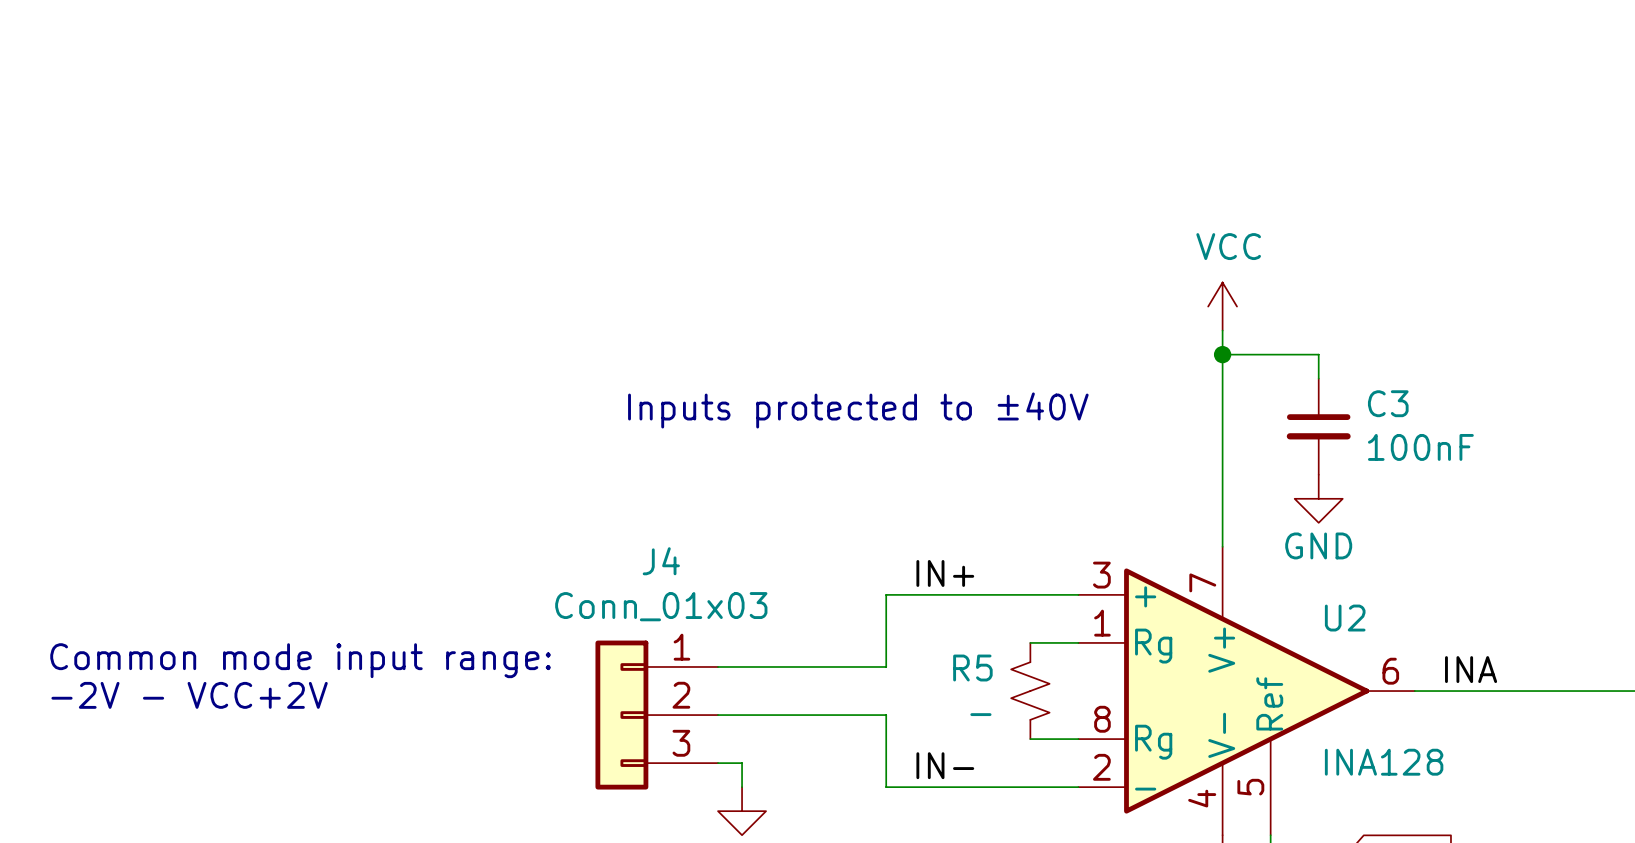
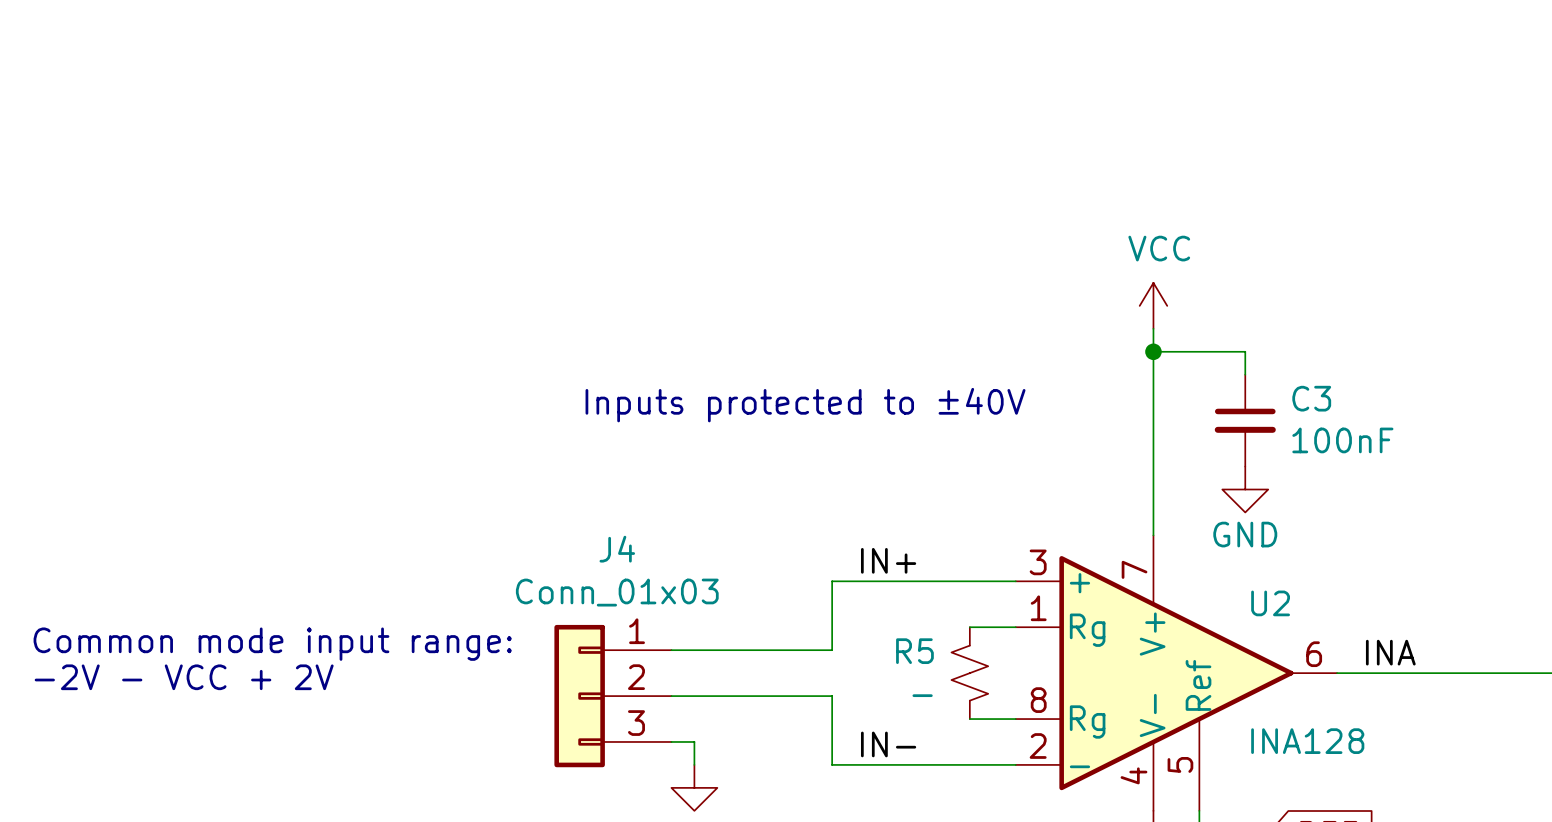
text: -2V - VCC+2V (189, 695) -> -2V - VCC + 2V (184, 677)

